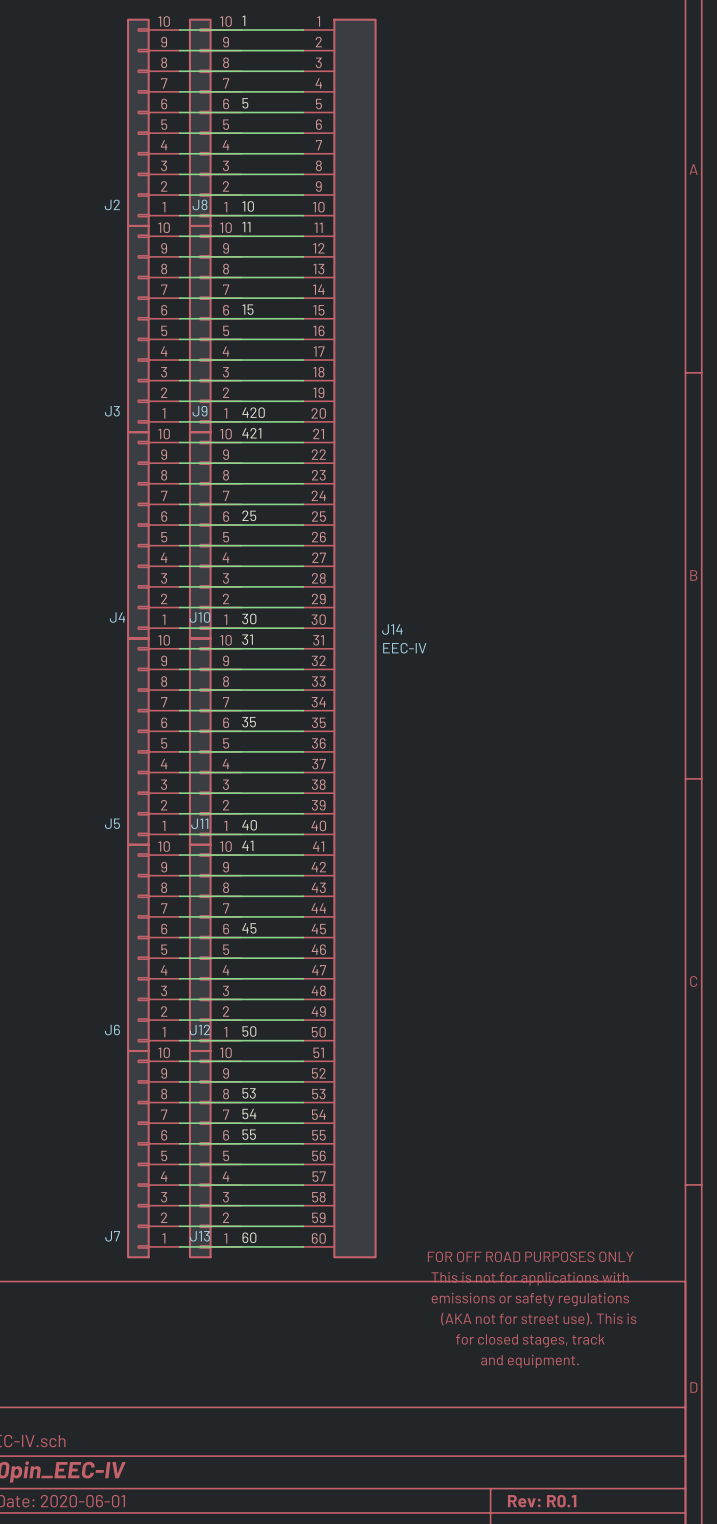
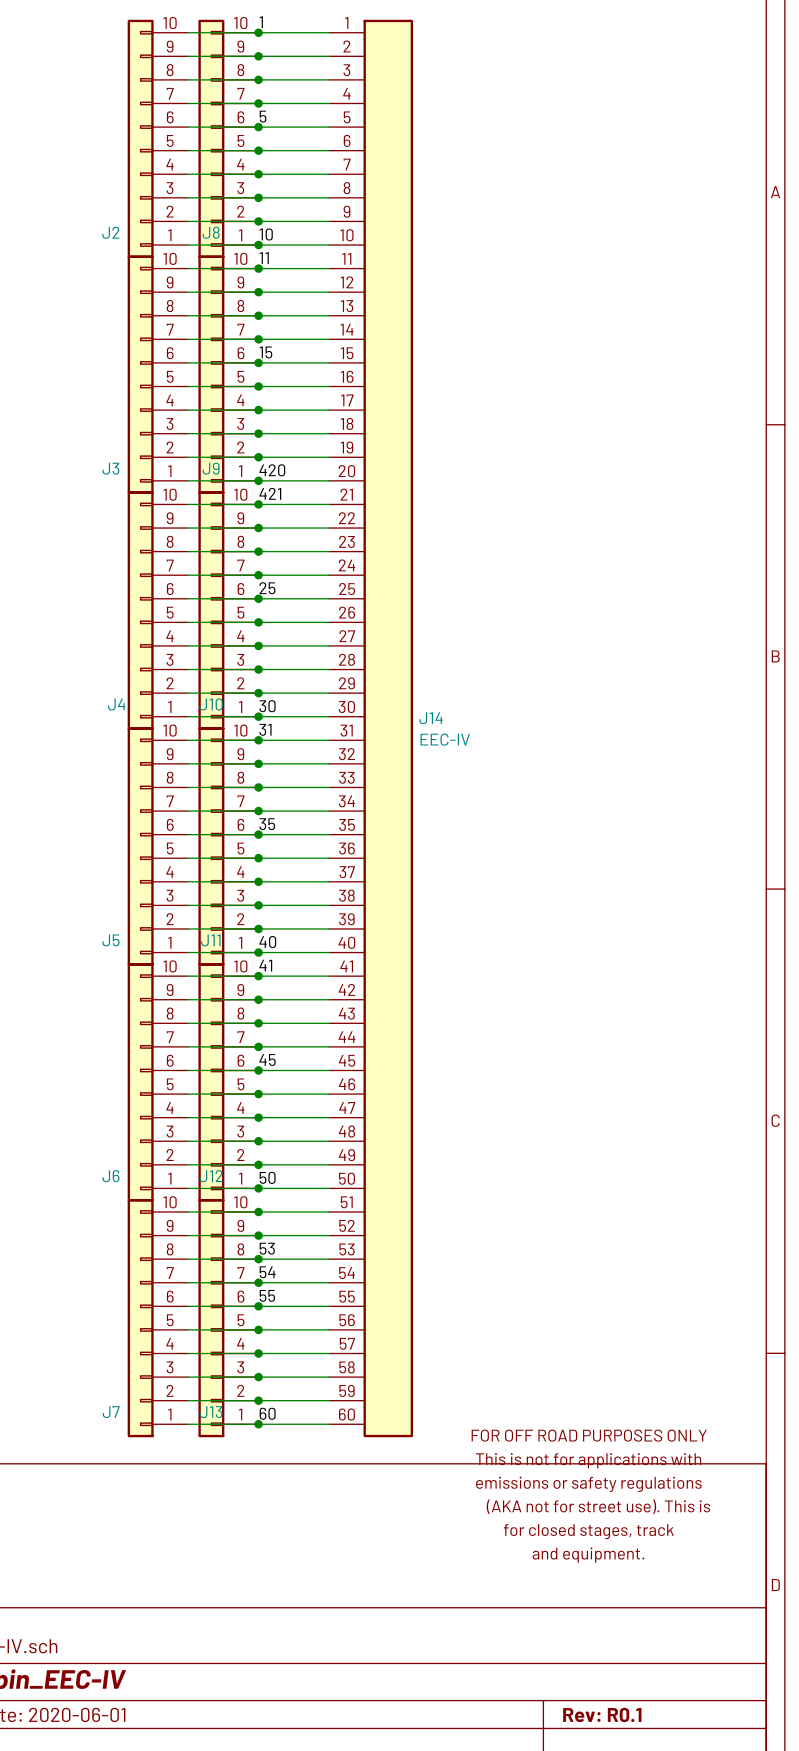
junction: none -> (258, 32)
junction: none -> (258, 56)
junction: none -> (258, 79)
junction: none -> (258, 103)
junction: none -> (258, 127)
junction: none -> (258, 150)
junction: none -> (258, 174)
junction: none -> (258, 197)
junction: none -> (258, 221)
junction: none -> (258, 245)
junction: none -> (258, 268)
junction: none -> (258, 292)
junction: none -> (258, 315)
junction: none -> (258, 339)
junction: none -> (258, 362)
junction: none -> (258, 386)
junction: none -> (258, 410)
junction: none -> (258, 433)
junction: none -> (258, 457)
junction: none -> (258, 480)
junction: none -> (258, 504)
junction: none -> (258, 528)
junction: none -> (258, 551)
junction: none -> (258, 575)
junction: none -> (258, 598)
junction: none -> (258, 622)
junction: none -> (258, 645)
junction: none -> (258, 669)
junction: none -> (258, 693)
junction: none -> (258, 716)
junction: none -> (258, 740)
junction: none -> (258, 763)
junction: none -> (258, 787)
junction: none -> (258, 811)
junction: none -> (258, 834)
junction: none -> (258, 858)
junction: none -> (258, 881)
junction: none -> (258, 905)
junction: none -> (258, 928)
junction: none -> (258, 952)
junction: none -> (258, 976)
junction: none -> (258, 999)
junction: none -> (258, 1023)
junction: none -> (258, 1046)
junction: none -> (258, 1070)
junction: none -> (258, 1094)
junction: none -> (258, 1117)
junction: none -> (258, 1141)
junction: none -> (258, 1164)
junction: none -> (258, 1188)
junction: none -> (258, 1211)
junction: none -> (258, 1235)
junction: none -> (258, 1259)
junction: none -> (258, 1282)
junction: none -> (258, 1306)
junction: none -> (258, 1329)
junction: none -> (258, 1353)
junction: none -> (258, 1377)
junction: none -> (258, 1400)
junction: none -> (258, 1424)

